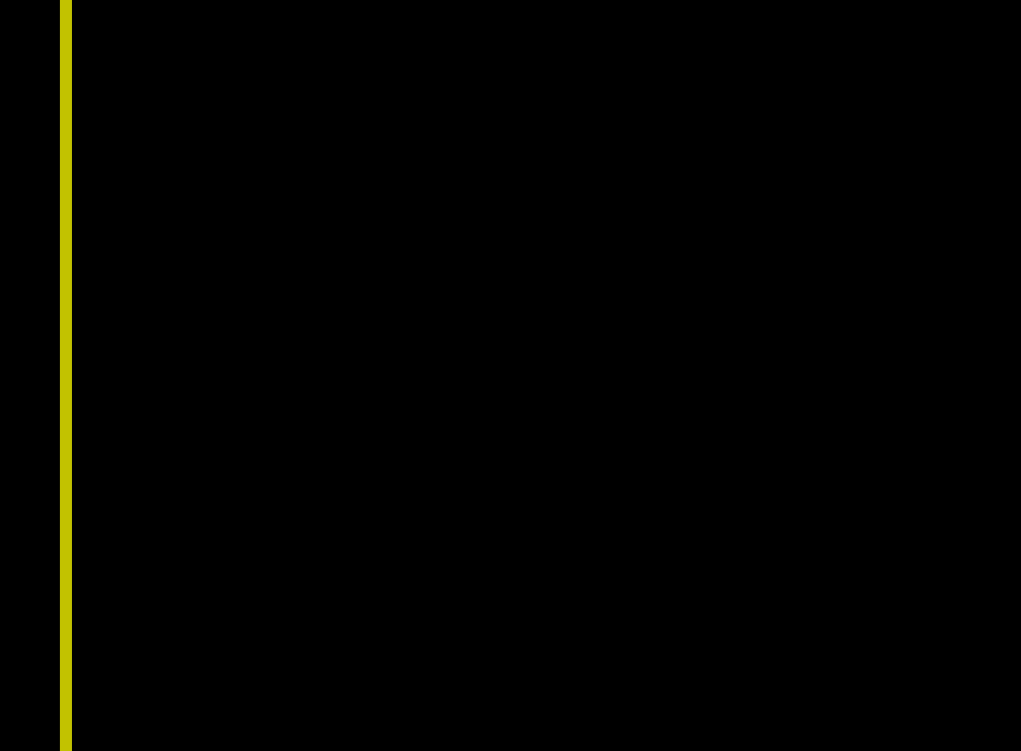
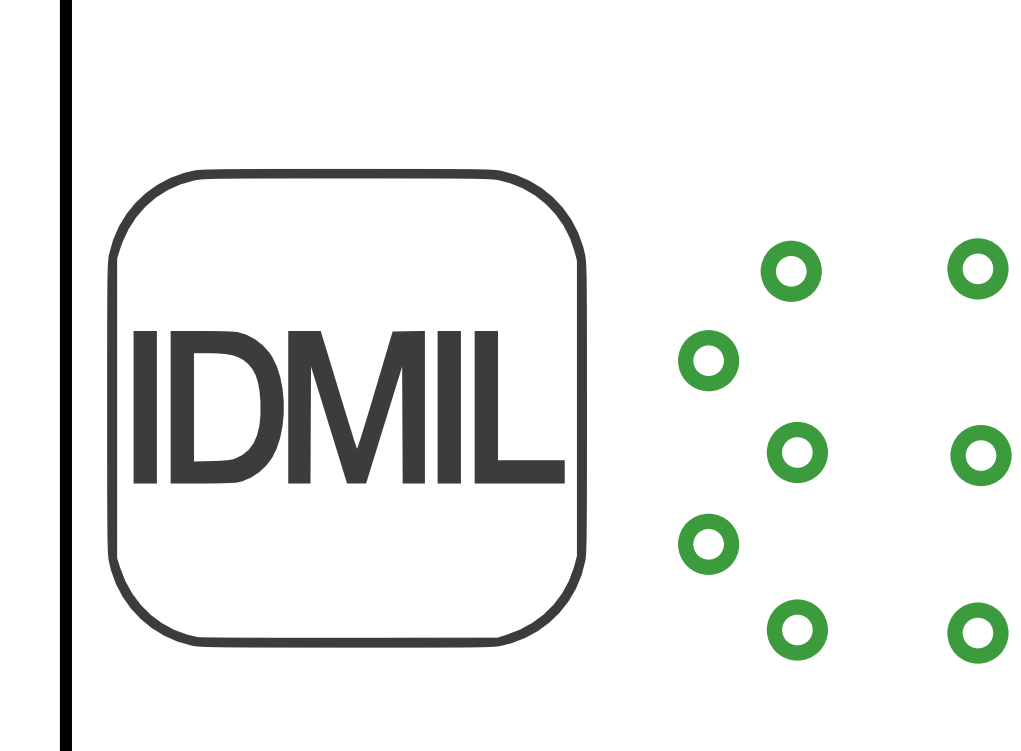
drawing: none -> [107, 168, 587, 648]
via: none -> (977, 268)
via: none -> (791, 271)
via: none -> (708, 360)
via: none -> (797, 452)
via: none -> (981, 455)
via: none -> (708, 544)
via: none -> (797, 630)
via: none -> (977, 633)

